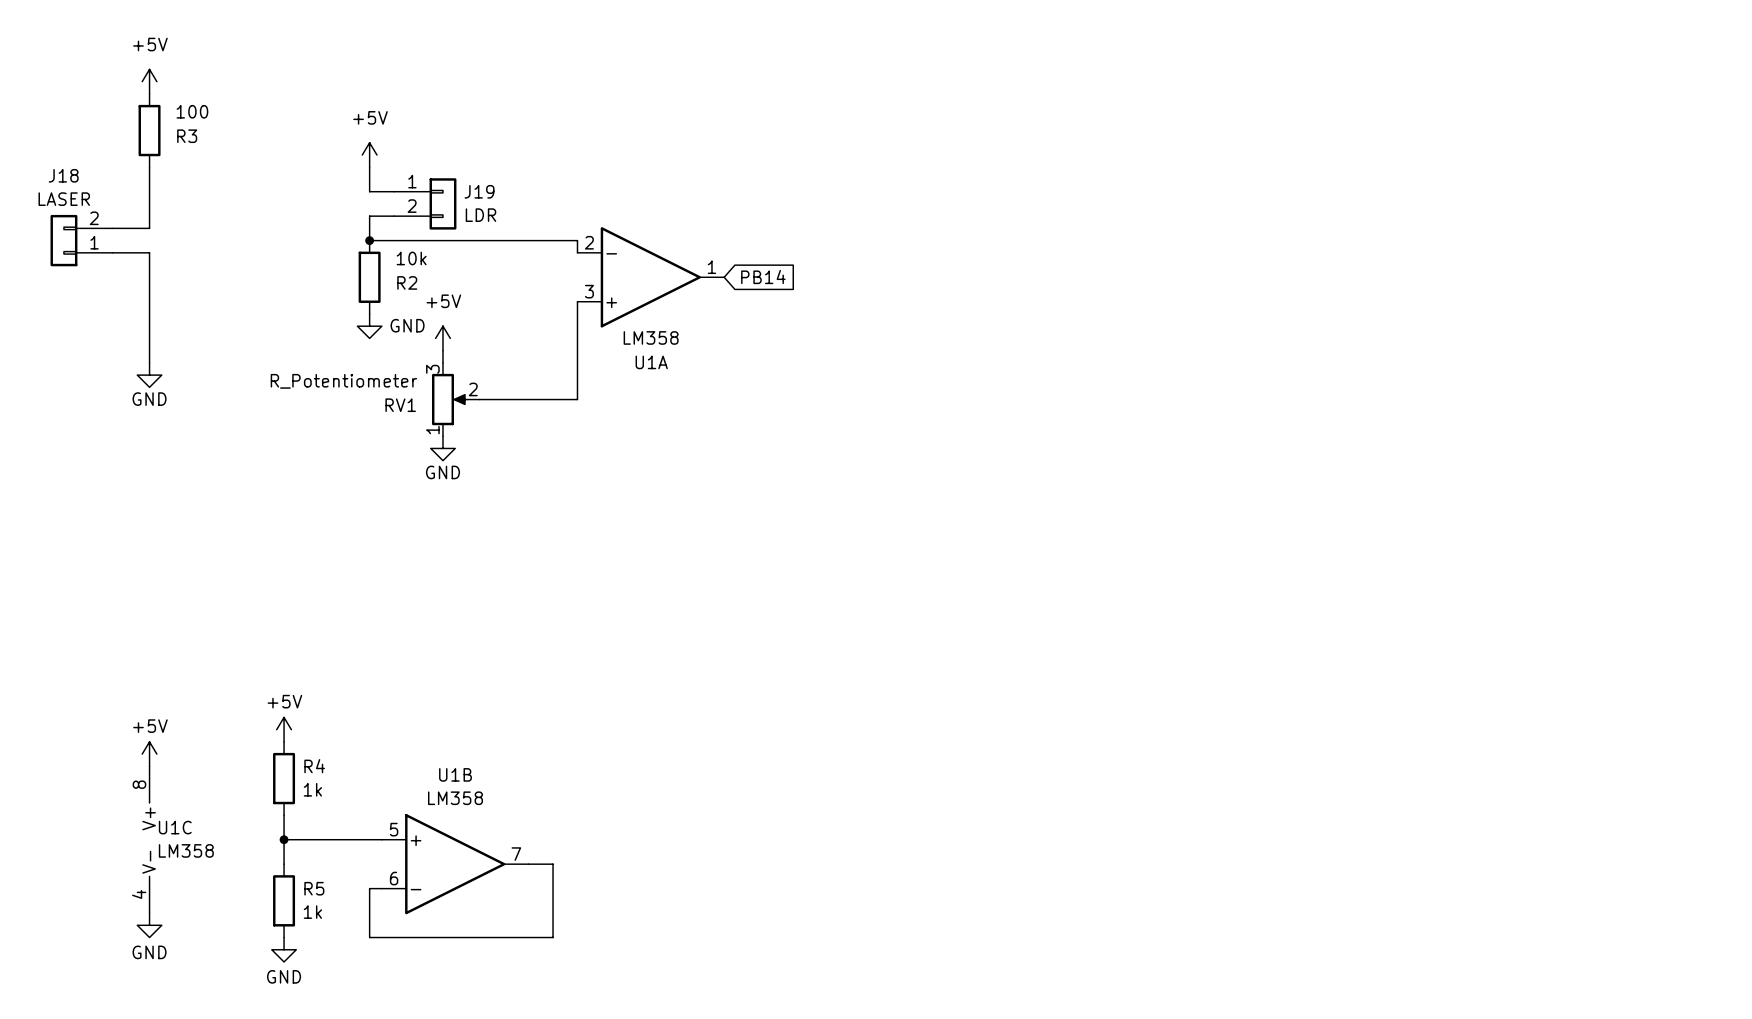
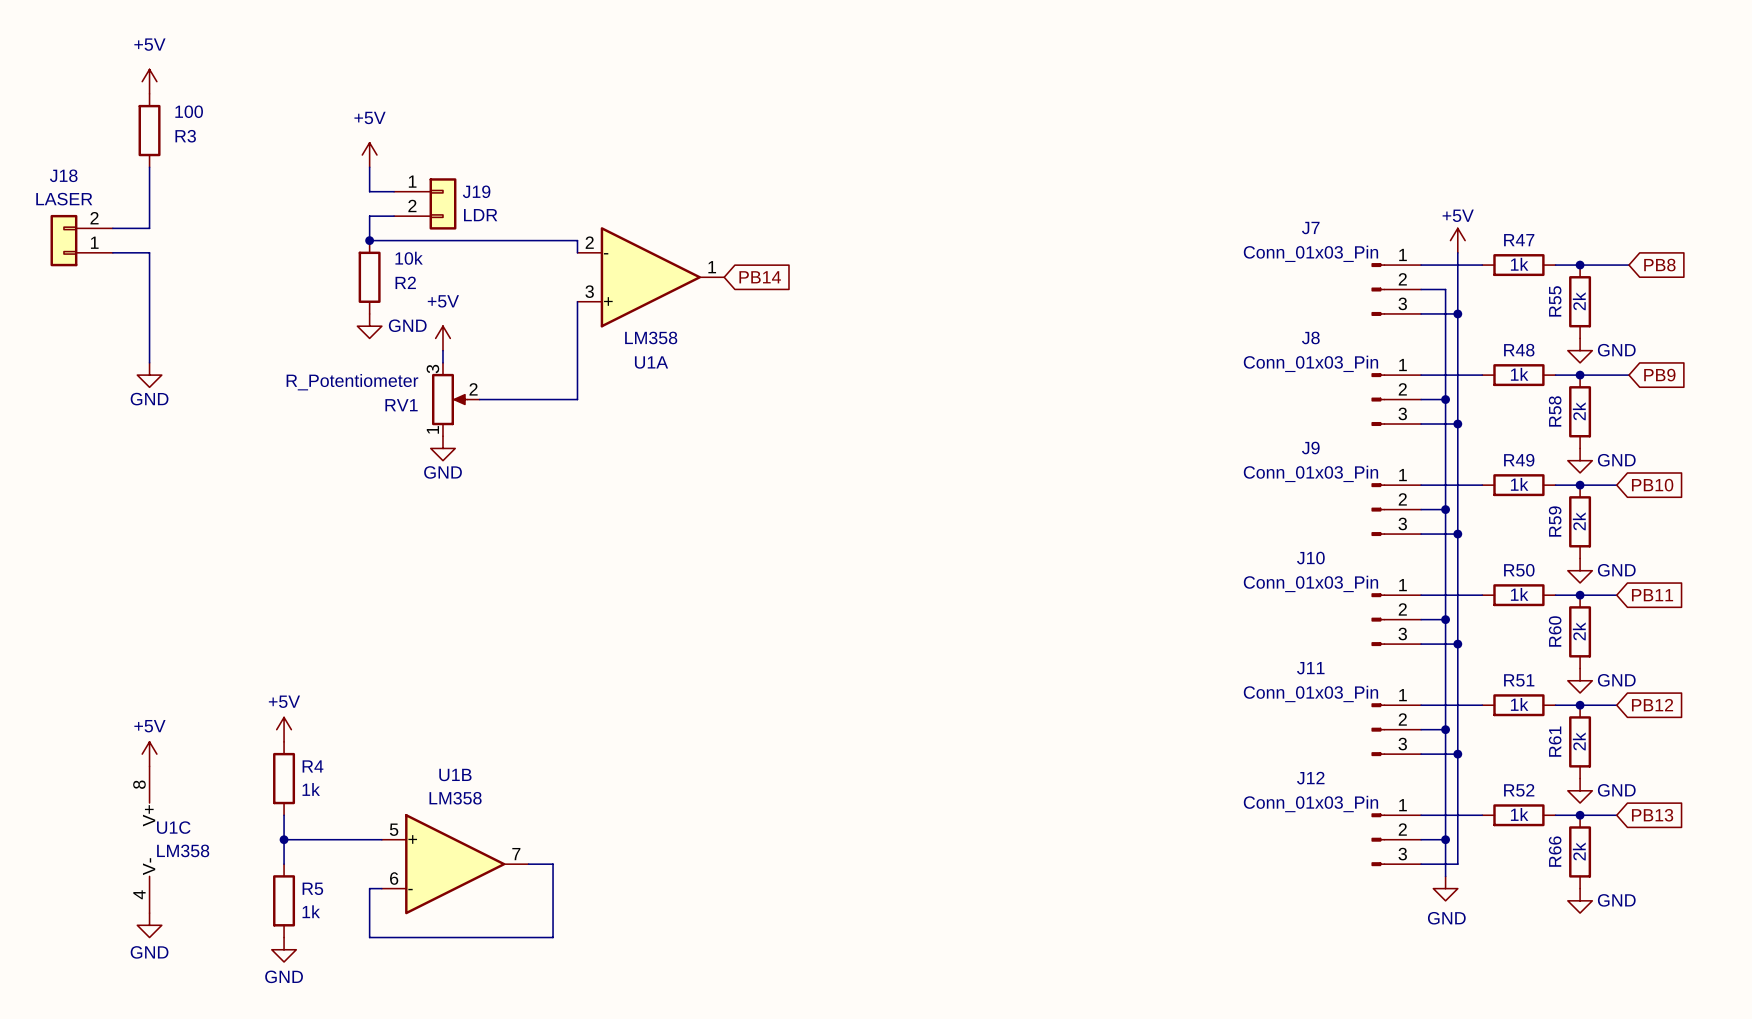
power symbol: none -> +5V (1457, 240)
wire: none -> (1457, 252) (1457, 864) (1421, 864)
wire: none -> (1421, 265) (1482, 265)
R47: none -> 1k (1518, 265)
wire: none -> (1555, 265) (1628, 265)
junction: none -> (1580, 265)
global label: none -> PB8 (1659, 265)
J7: none -> Conn_01x03_Pin (1396, 289)
wire: none -> (1421, 289) (1445, 289) (1445, 876)
R55: none -> 2k (1580, 301)
wire: none -> (1421, 313) (1457, 313)
junction: none -> (1457, 313)
power symbol: none -> GND (1580, 350)
wire: none -> (1421, 375) (1482, 375)
R48: none -> 1k (1518, 375)
wire: none -> (1555, 375) (1628, 375)
junction: none -> (1580, 375)
global label: none -> PB9 (1659, 375)
J8: none -> Conn_01x03_Pin (1396, 399)
wire: none -> (1421, 399) (1445, 399)
junction: none -> (1445, 399)
R58: none -> 2k (1580, 411)
wire: none -> (1421, 424) (1457, 424)
junction: none -> (1457, 424)
power symbol: none -> GND (1580, 460)
wire: none -> (1421, 485) (1482, 485)
R49: none -> 1k (1518, 485)
wire: none -> (1555, 485) (1616, 485)
junction: none -> (1580, 485)
global label: none -> PB10 (1652, 485)
J9: none -> Conn_01x03_Pin (1396, 509)
wire: none -> (1421, 509) (1445, 509)
junction: none -> (1445, 509)
R59: none -> 2k (1580, 521)
wire: none -> (1421, 534) (1457, 534)
junction: none -> (1457, 534)
power symbol: none -> GND (1580, 570)
wire: none -> (1421, 595) (1482, 595)
R50: none -> 1k (1518, 595)
wire: none -> (1555, 595) (1616, 595)
junction: none -> (1580, 595)
global label: none -> PB11 (1652, 595)
J10: none -> Conn_01x03_Pin (1396, 619)
wire: none -> (1421, 619) (1445, 619)
junction: none -> (1445, 619)
R60: none -> 2k (1580, 631)
wire: none -> (1421, 644) (1457, 644)
junction: none -> (1457, 644)
power symbol: none -> GND (1580, 680)
wire: none -> (1421, 705) (1482, 705)
R51: none -> 1k (1518, 705)
wire: none -> (1555, 705) (1616, 705)
junction: none -> (1580, 705)
global label: none -> PB12 (1652, 705)
J11: none -> Conn_01x03_Pin (1396, 729)
wire: none -> (1421, 729) (1445, 729)
junction: none -> (1445, 729)
R61: none -> 2k (1580, 741)
wire: none -> (1421, 754) (1457, 754)
junction: none -> (1457, 754)
power symbol: none -> GND (1580, 790)
wire: none -> (1421, 815) (1482, 815)
R52: none -> 1k (1518, 815)
wire: none -> (1555, 815) (1616, 815)
junction: none -> (1580, 815)
global label: none -> PB13 (1652, 815)
J12: none -> Conn_01x03_Pin (1396, 839)
wire: none -> (1421, 839) (1445, 839)
junction: none -> (1445, 839)
R66: none -> 2k (1580, 851)
power symbol: none -> GND (1445, 888)
power symbol: none -> GND (1580, 900)

